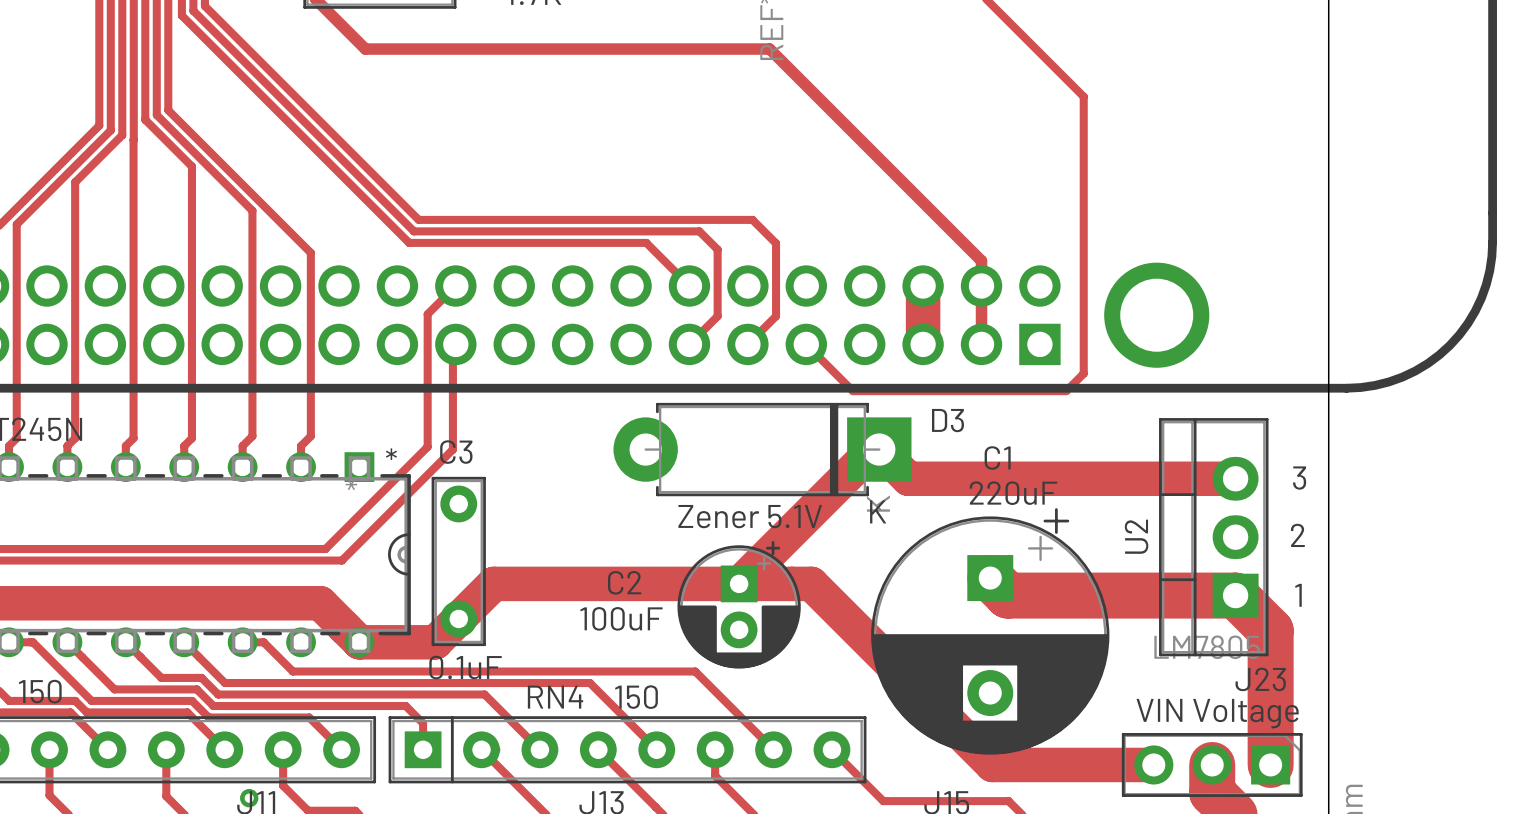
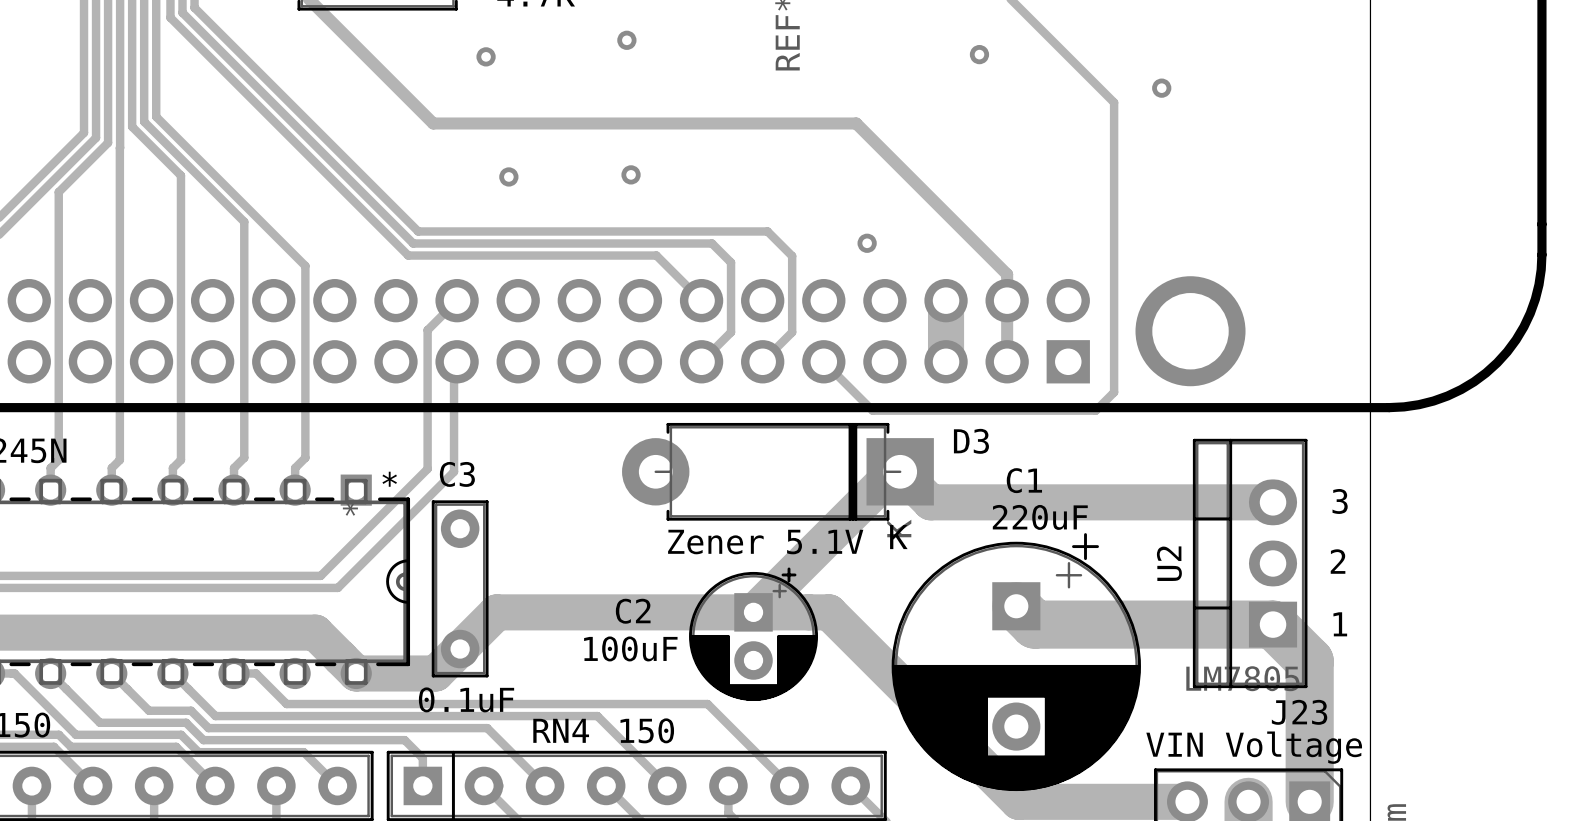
via: none -> (626, 40)
track: (365, 49) (769, 49) (837, 116) -> (362, 52) (433, 123) (856, 123)
via: none -> (979, 54)
via: none -> (486, 56)
via: none -> (1161, 88)
via: none -> (631, 174)
via: none -> (508, 176)
via: none -> (867, 243)

